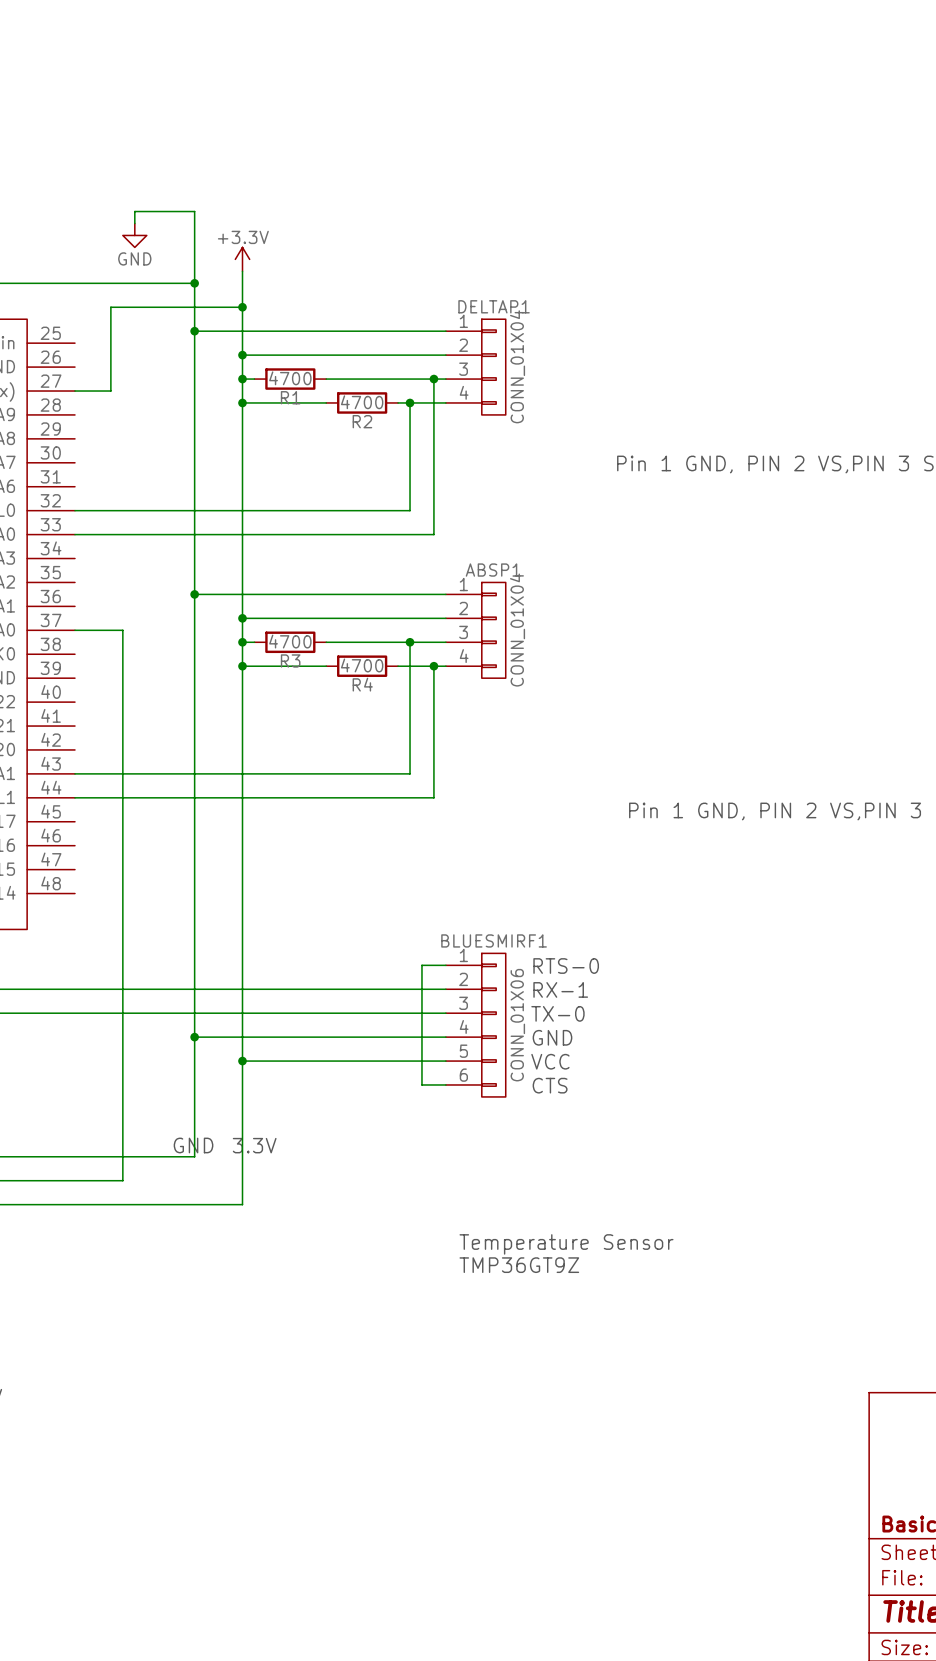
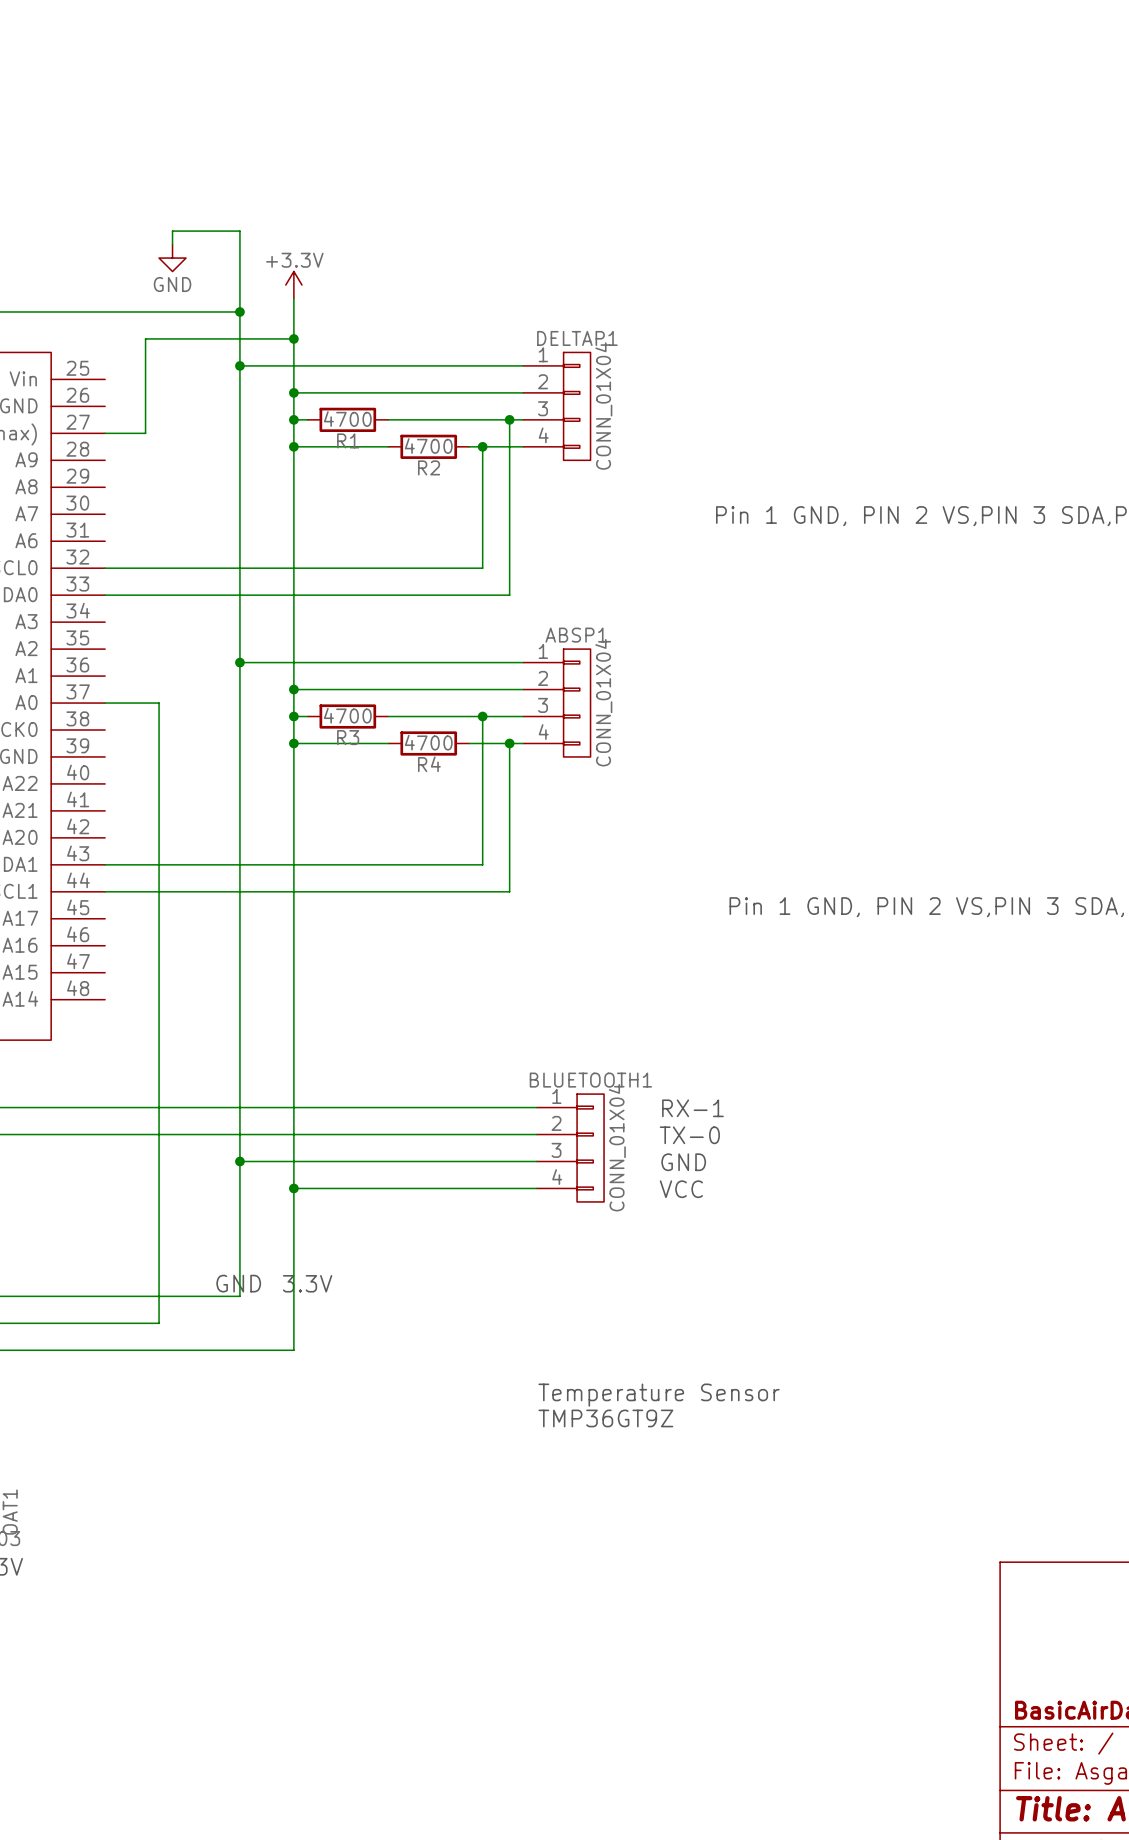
wire: (445, 965) (421, 965) (421, 1084) (445, 1084) -> none
text: RTS-0 (566, 966) -> none
text position: RX-1 (560, 989) -> RX-1 (692, 1108)
text position: TX-0 (557, 1013) -> TX-0 (689, 1135)
BLUESMIRF1: CONN_01X06 (475, 1025) -> none
BLUETOOTH1: none -> CONN_01X04 (570, 1148)
text position: GND (552, 1037) -> GND (683, 1162)
text position: VCC (550, 1061) -> VCC (681, 1189)
text: CTS (550, 1085) -> none

